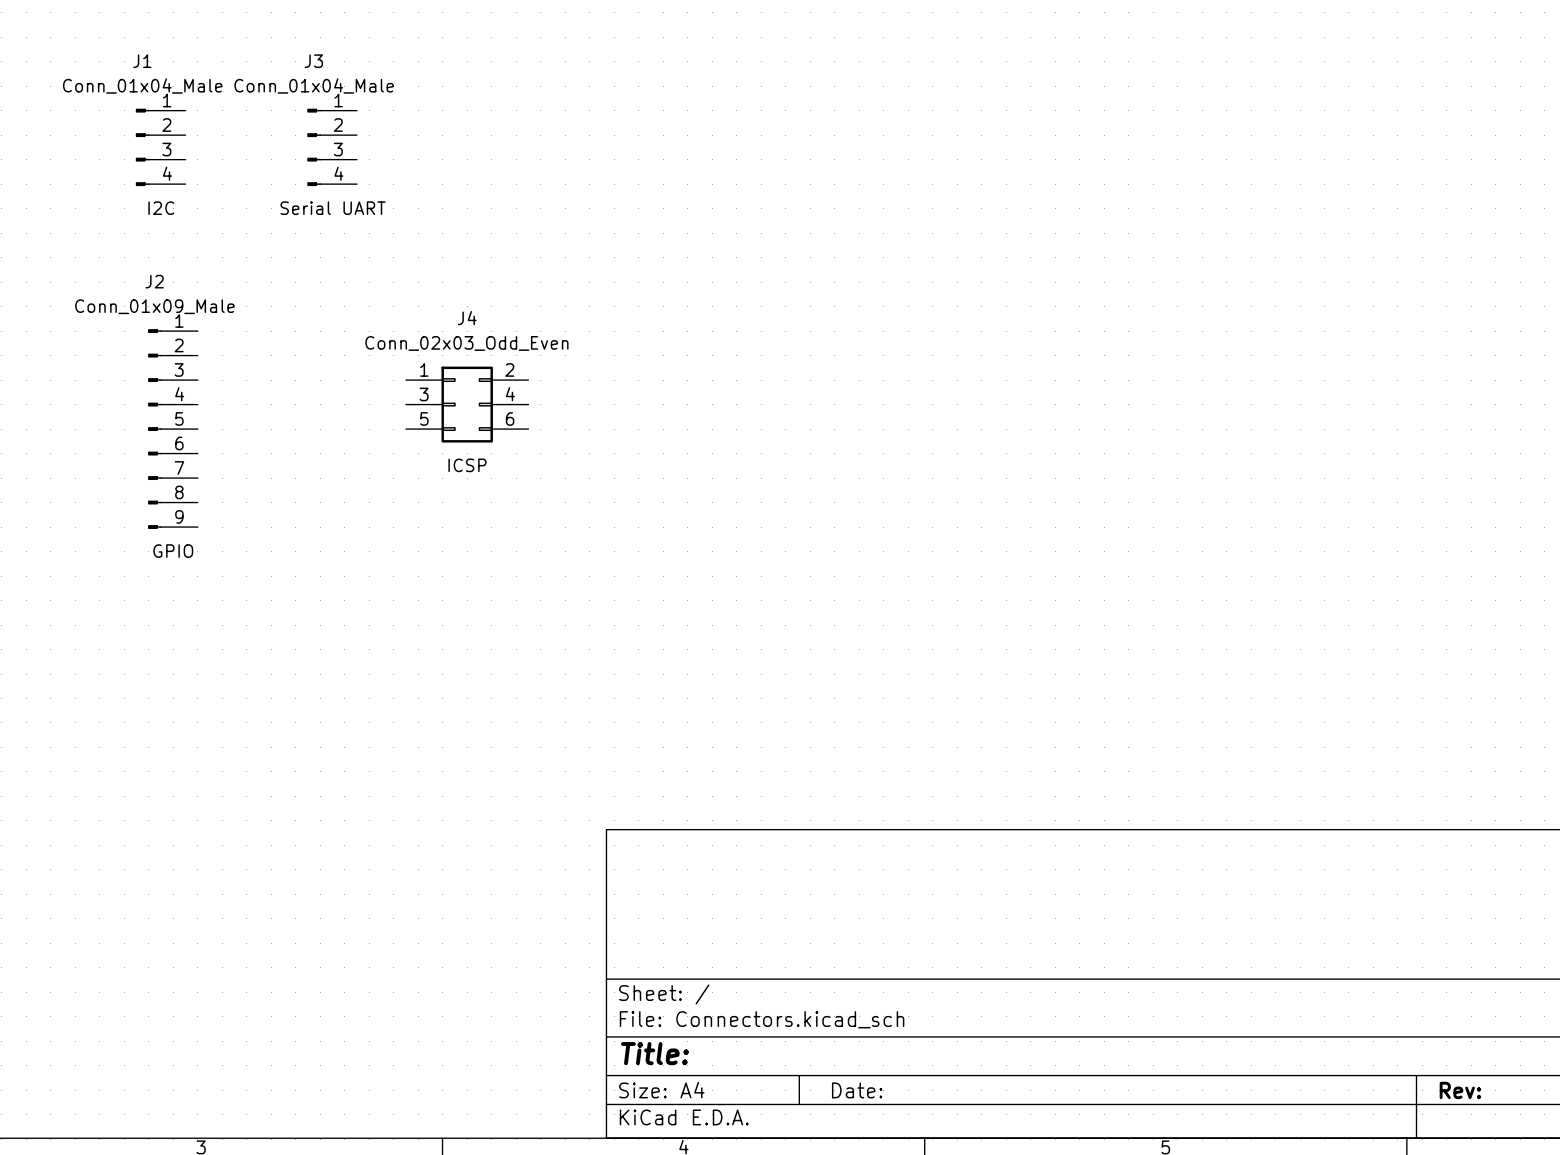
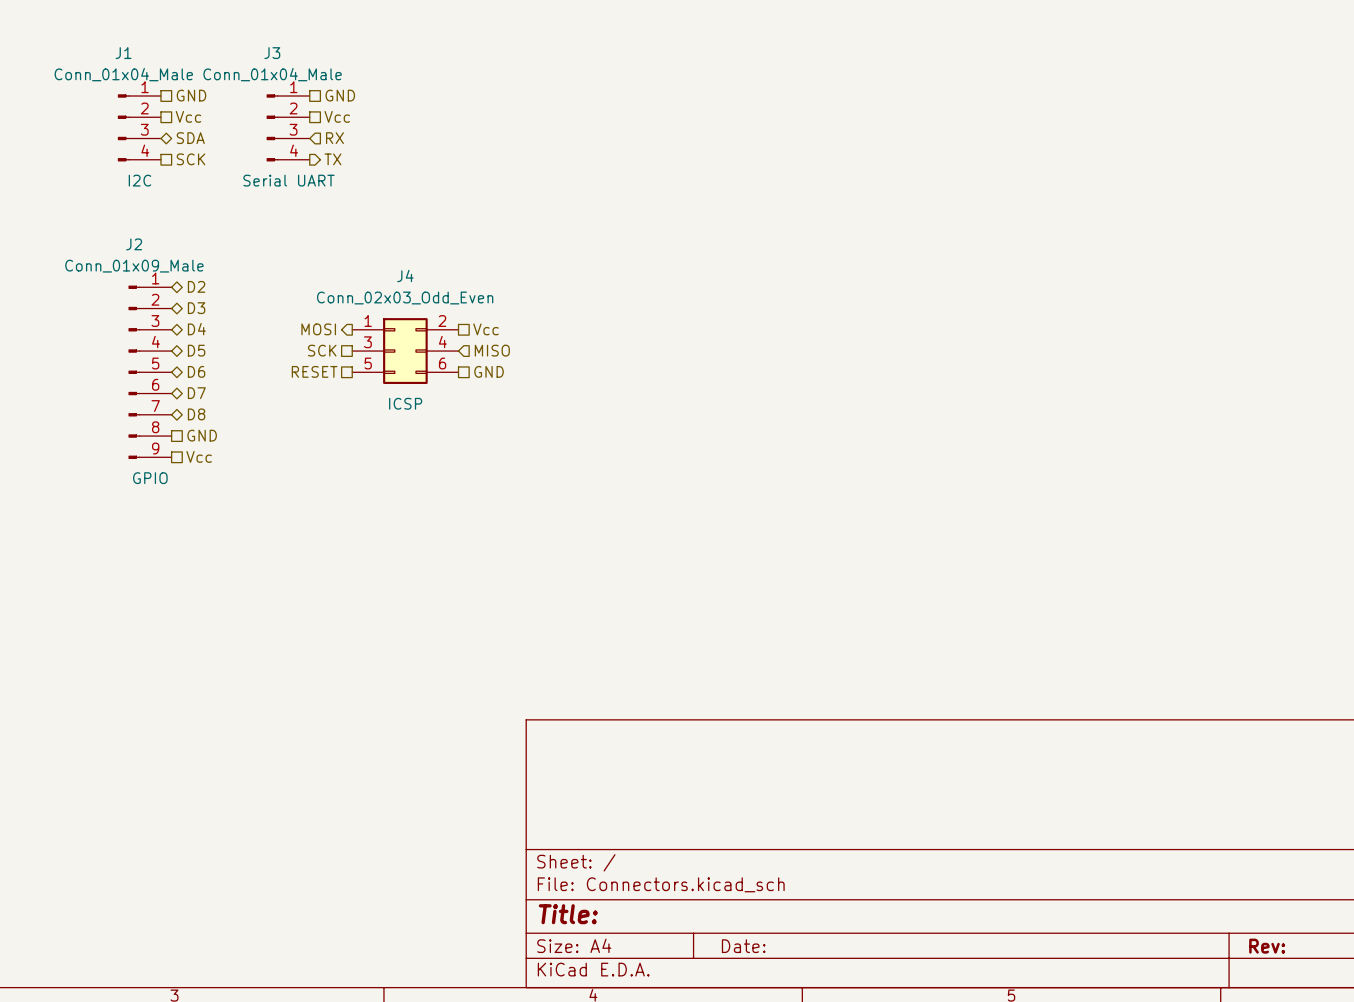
hierarchical label: none -> GND (191, 95)
hierarchical label: none -> GND (340, 95)
hierarchical label: none -> Vcc (188, 116)
hierarchical label: none -> Vcc (337, 116)
hierarchical label: none -> SDA (190, 138)
hierarchical label: none -> RX (334, 138)
hierarchical label: none -> SCK (191, 159)
hierarchical label: none -> TX (332, 159)
hierarchical label: none -> D2 (196, 286)
hierarchical label: none -> D3 (196, 308)
hierarchical label: none -> D4 (196, 329)
hierarchical label: none -> MOSI (318, 329)
hierarchical label: none -> Vcc (486, 329)
hierarchical label: none -> D5 (196, 350)
hierarchical label: none -> SCK (322, 350)
hierarchical label: none -> MISO (492, 350)
hierarchical label: none -> D6 (196, 371)
hierarchical label: none -> RESET (314, 371)
hierarchical label: none -> GND (489, 371)
hierarchical label: none -> D7 (196, 393)
hierarchical label: none -> D8 (196, 414)
hierarchical label: none -> GND (202, 435)
hierarchical label: none -> Vcc (199, 456)

